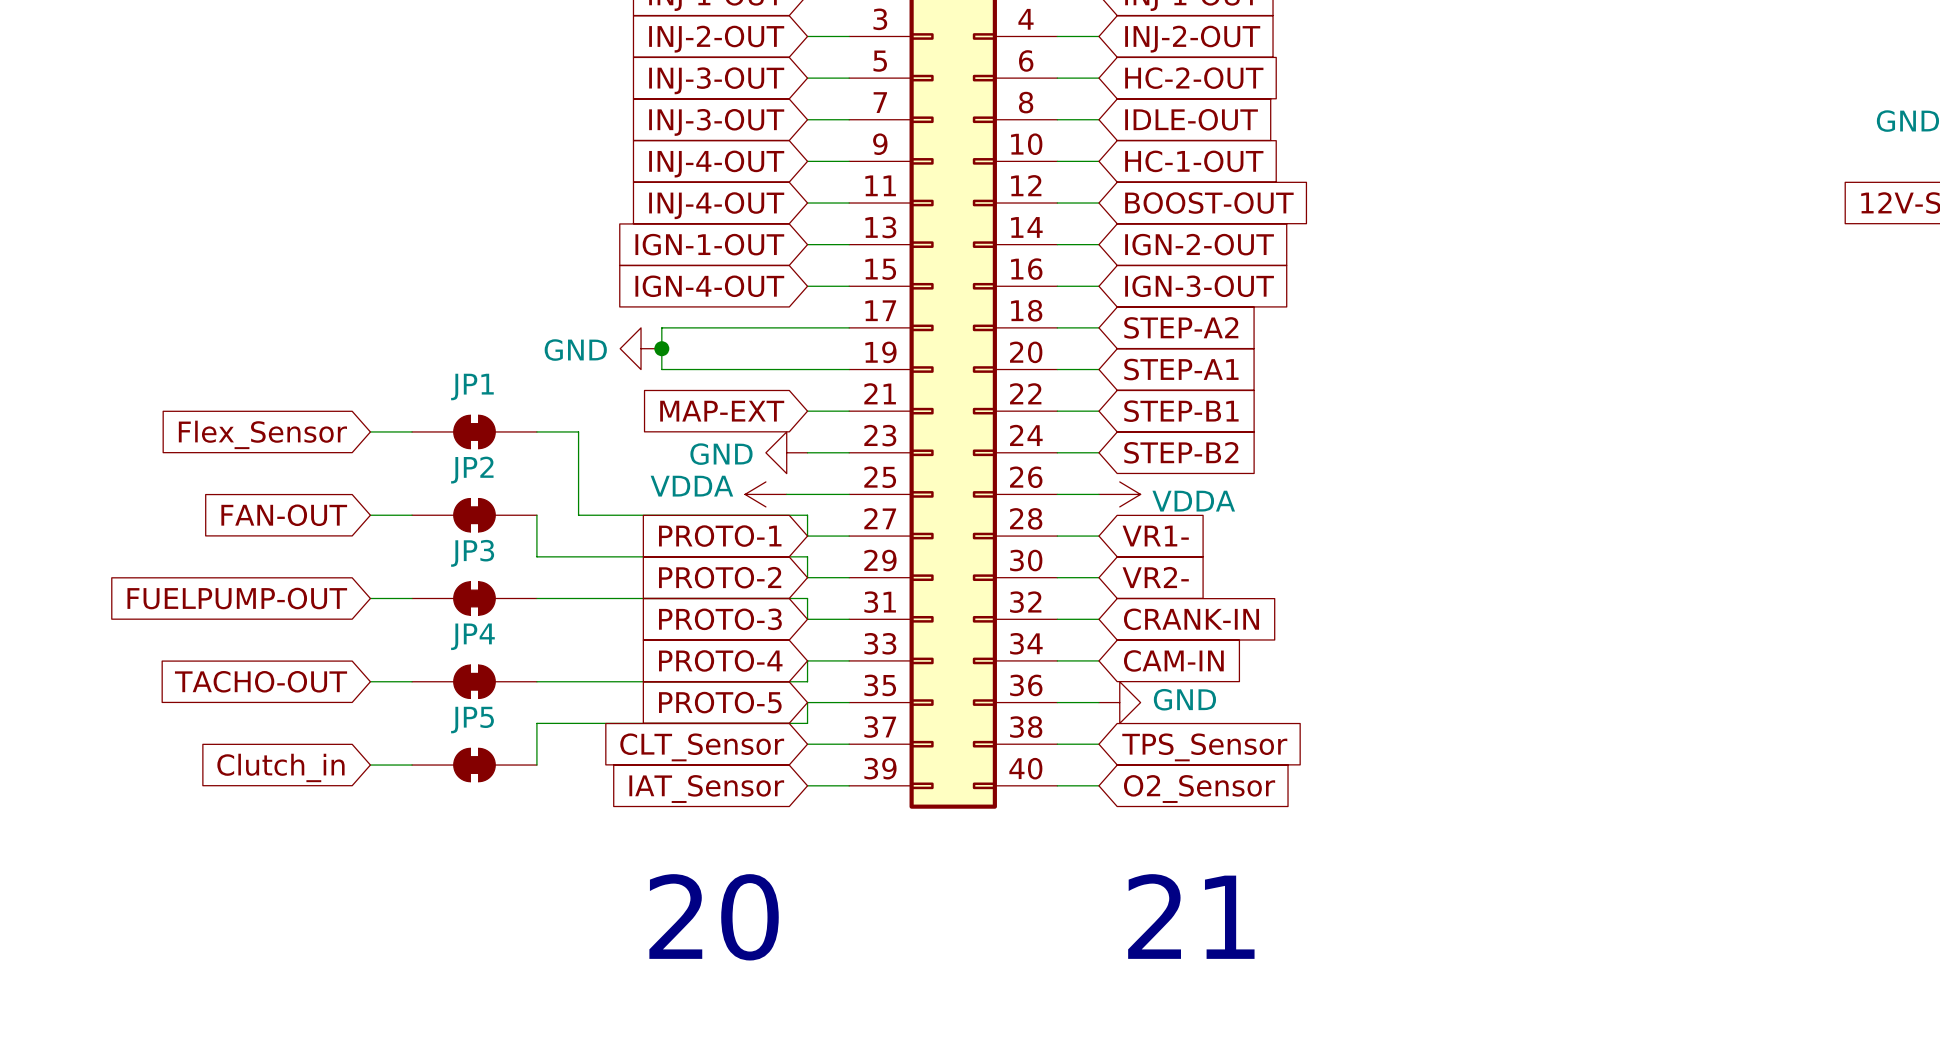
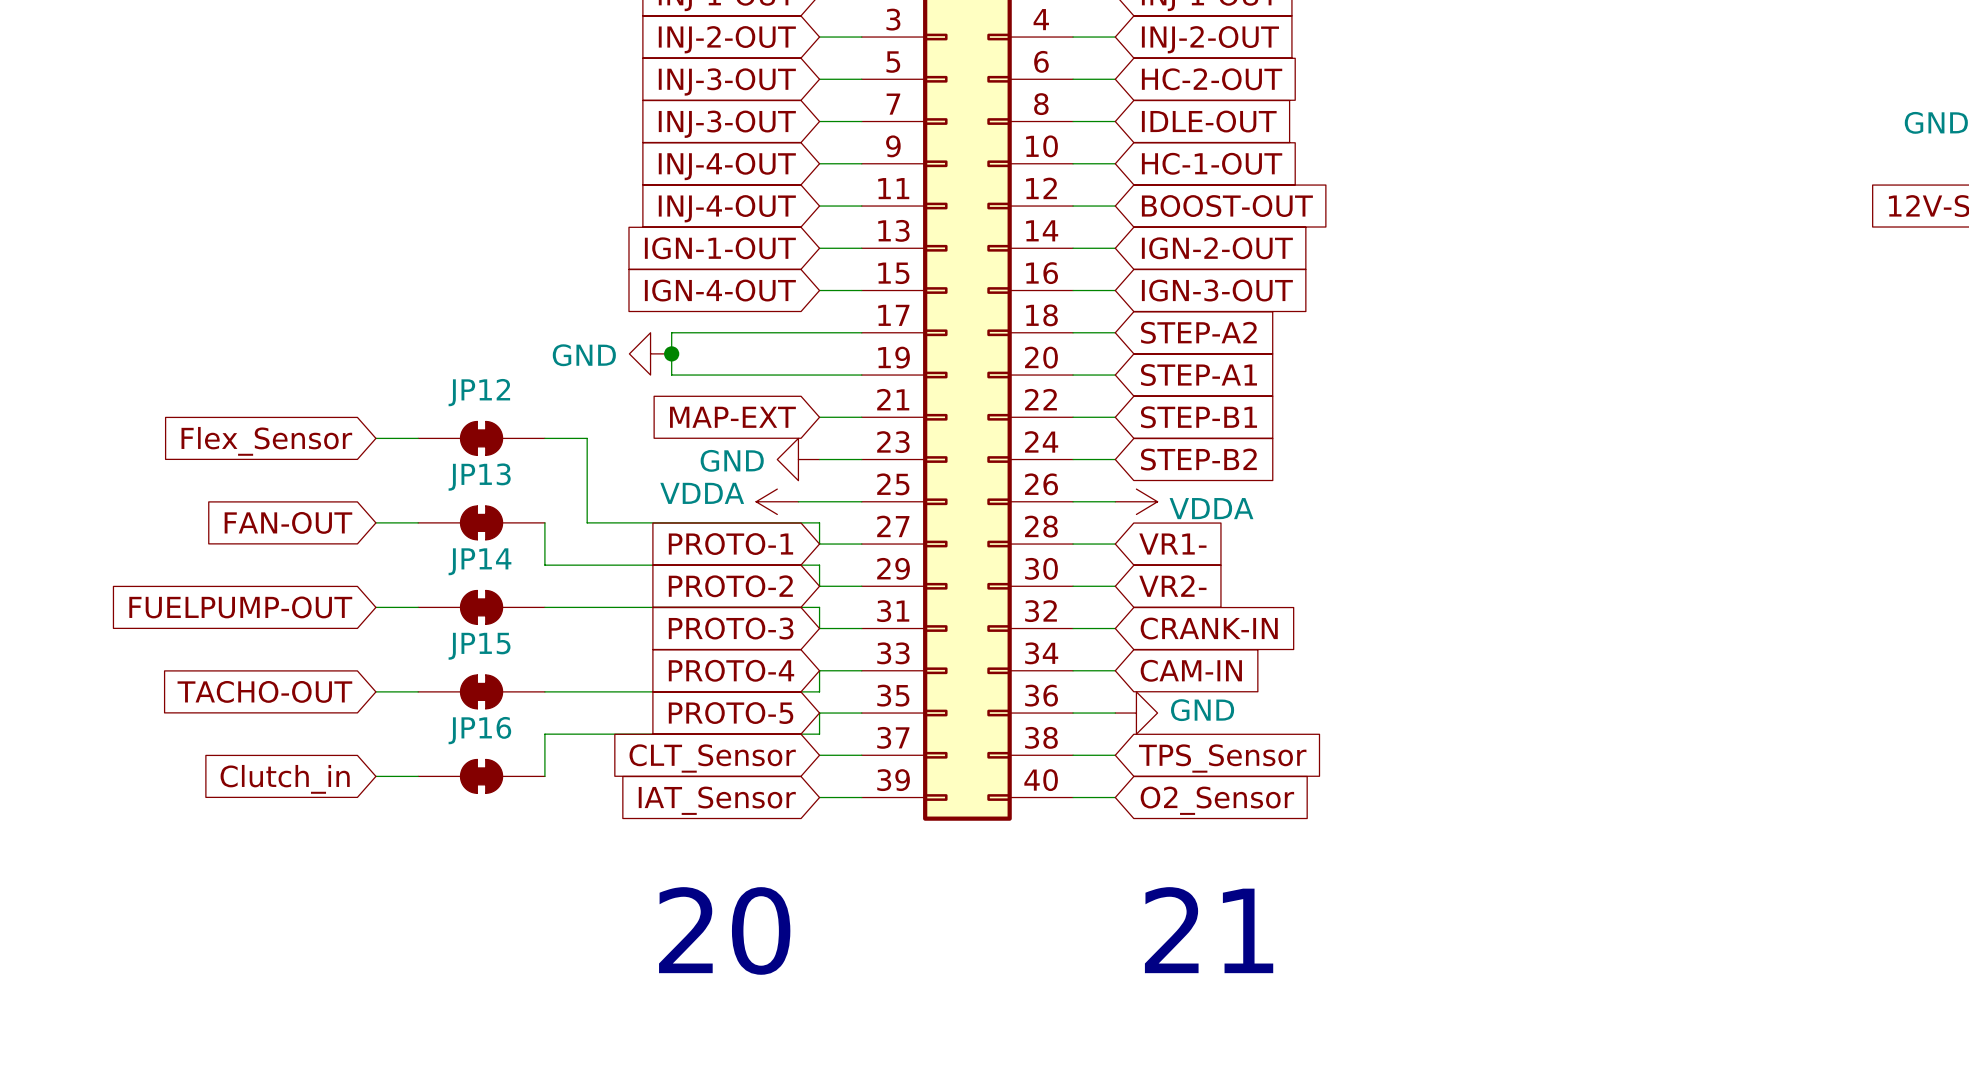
JP1 name: JP1 (472, 387) -> JP12 (479, 392)
JP2 name: JP2 (472, 470) -> JP13 (479, 477)
JP3 name: JP3 (472, 553) -> JP14 (479, 561)
JP4 name: JP4 (472, 636) -> JP15 (479, 646)
JP5 name: JP5 (472, 720) -> JP16 (479, 730)

